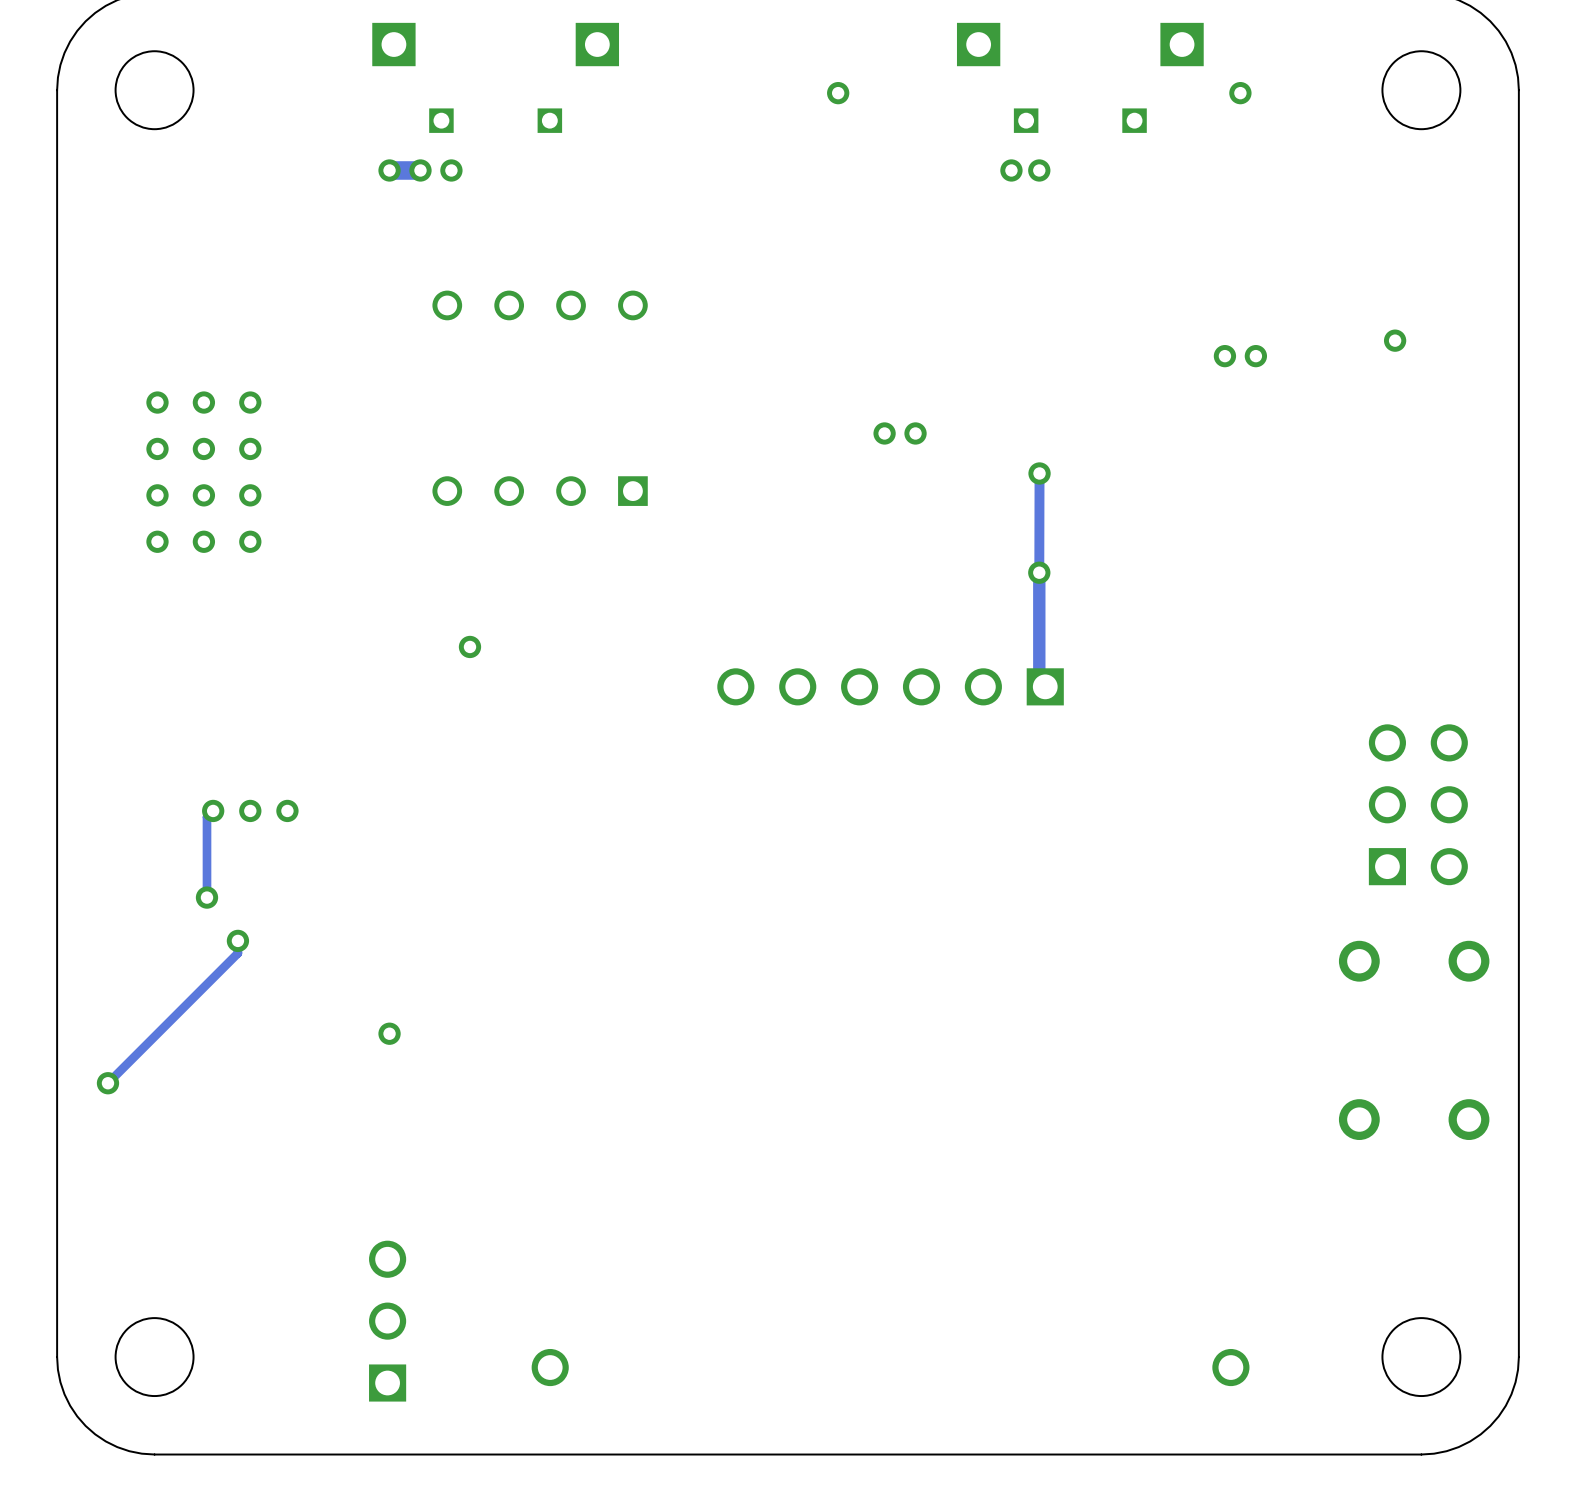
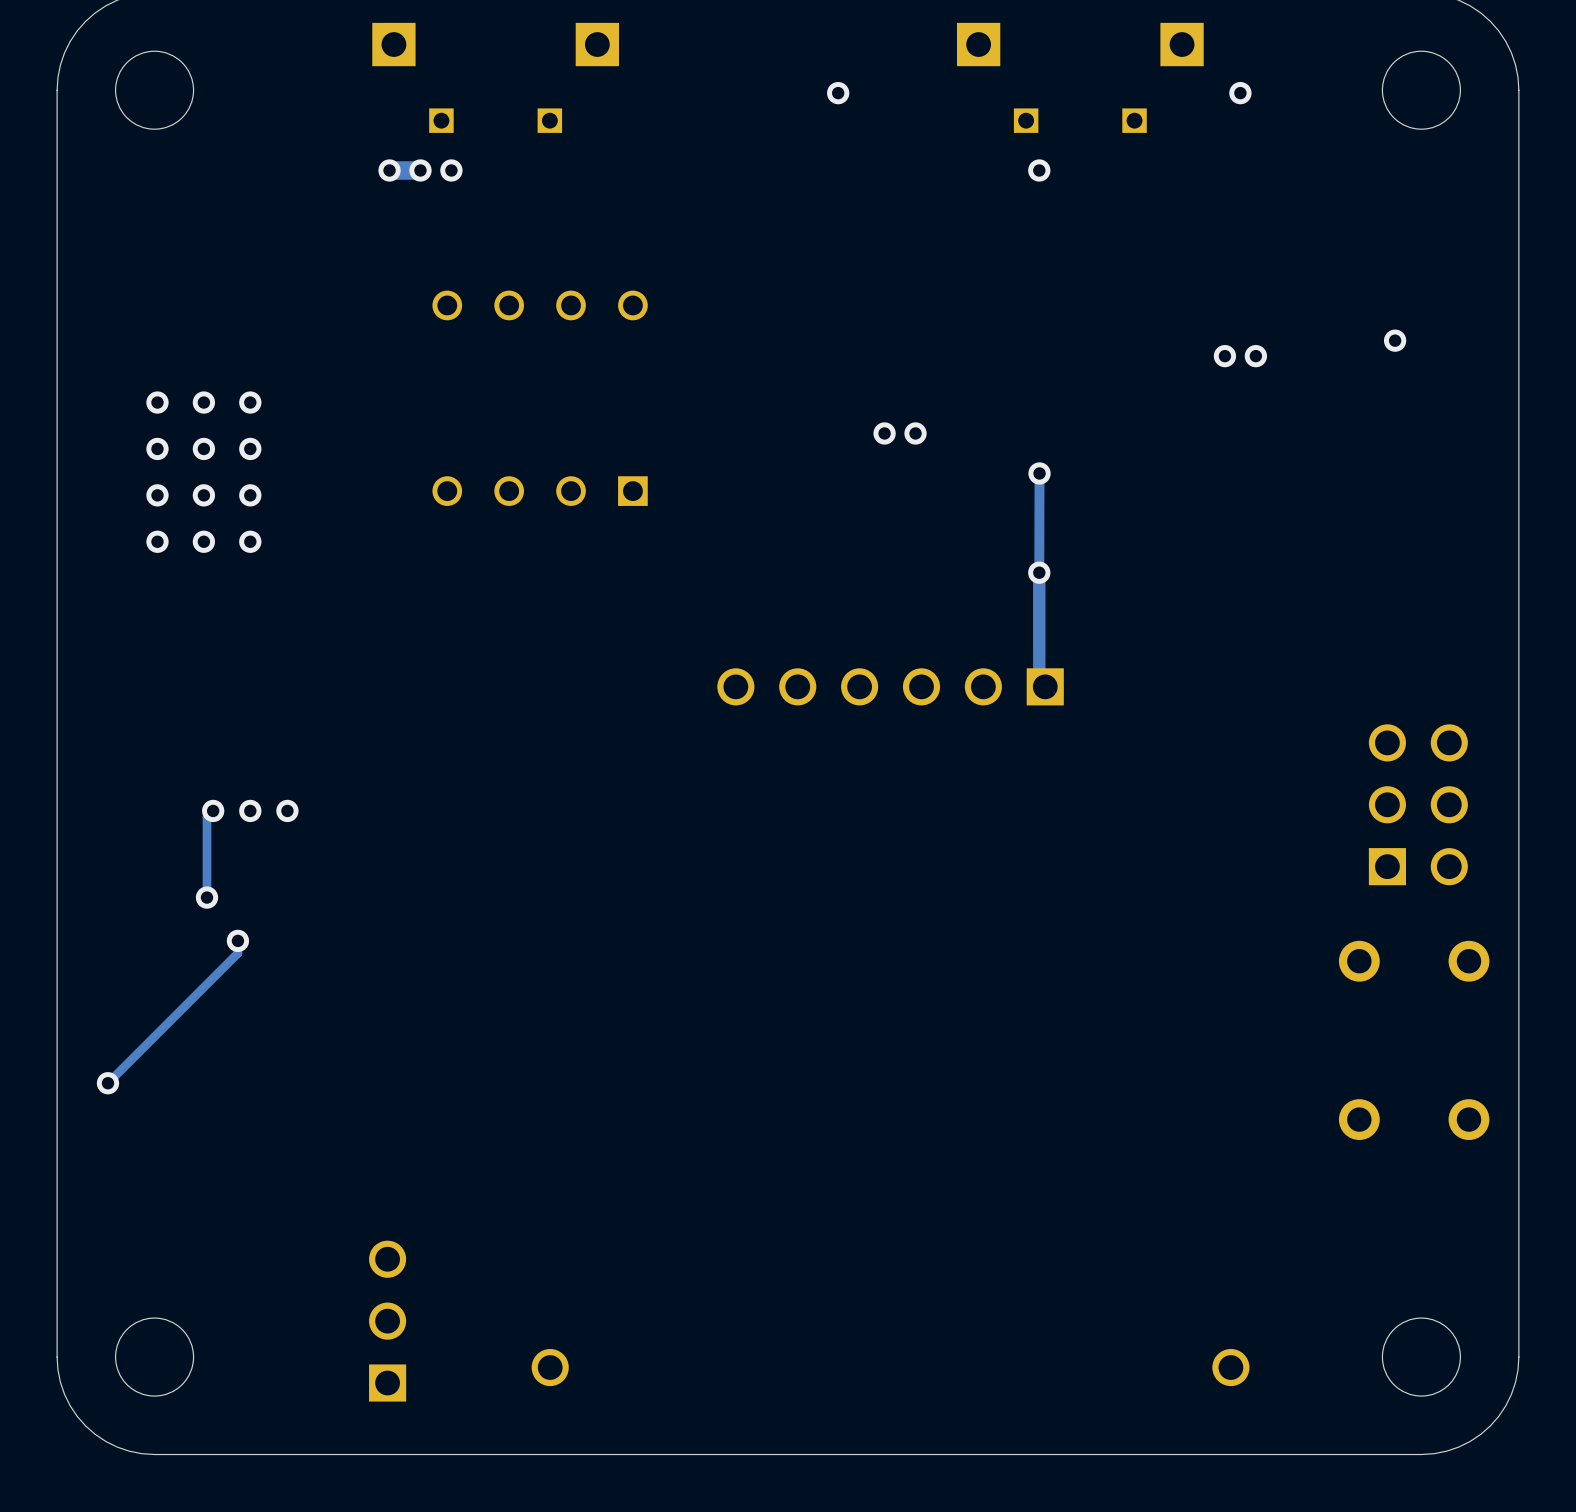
via: (1011, 170) -> none
via: (469, 646) -> none
via: (389, 1033) -> none

